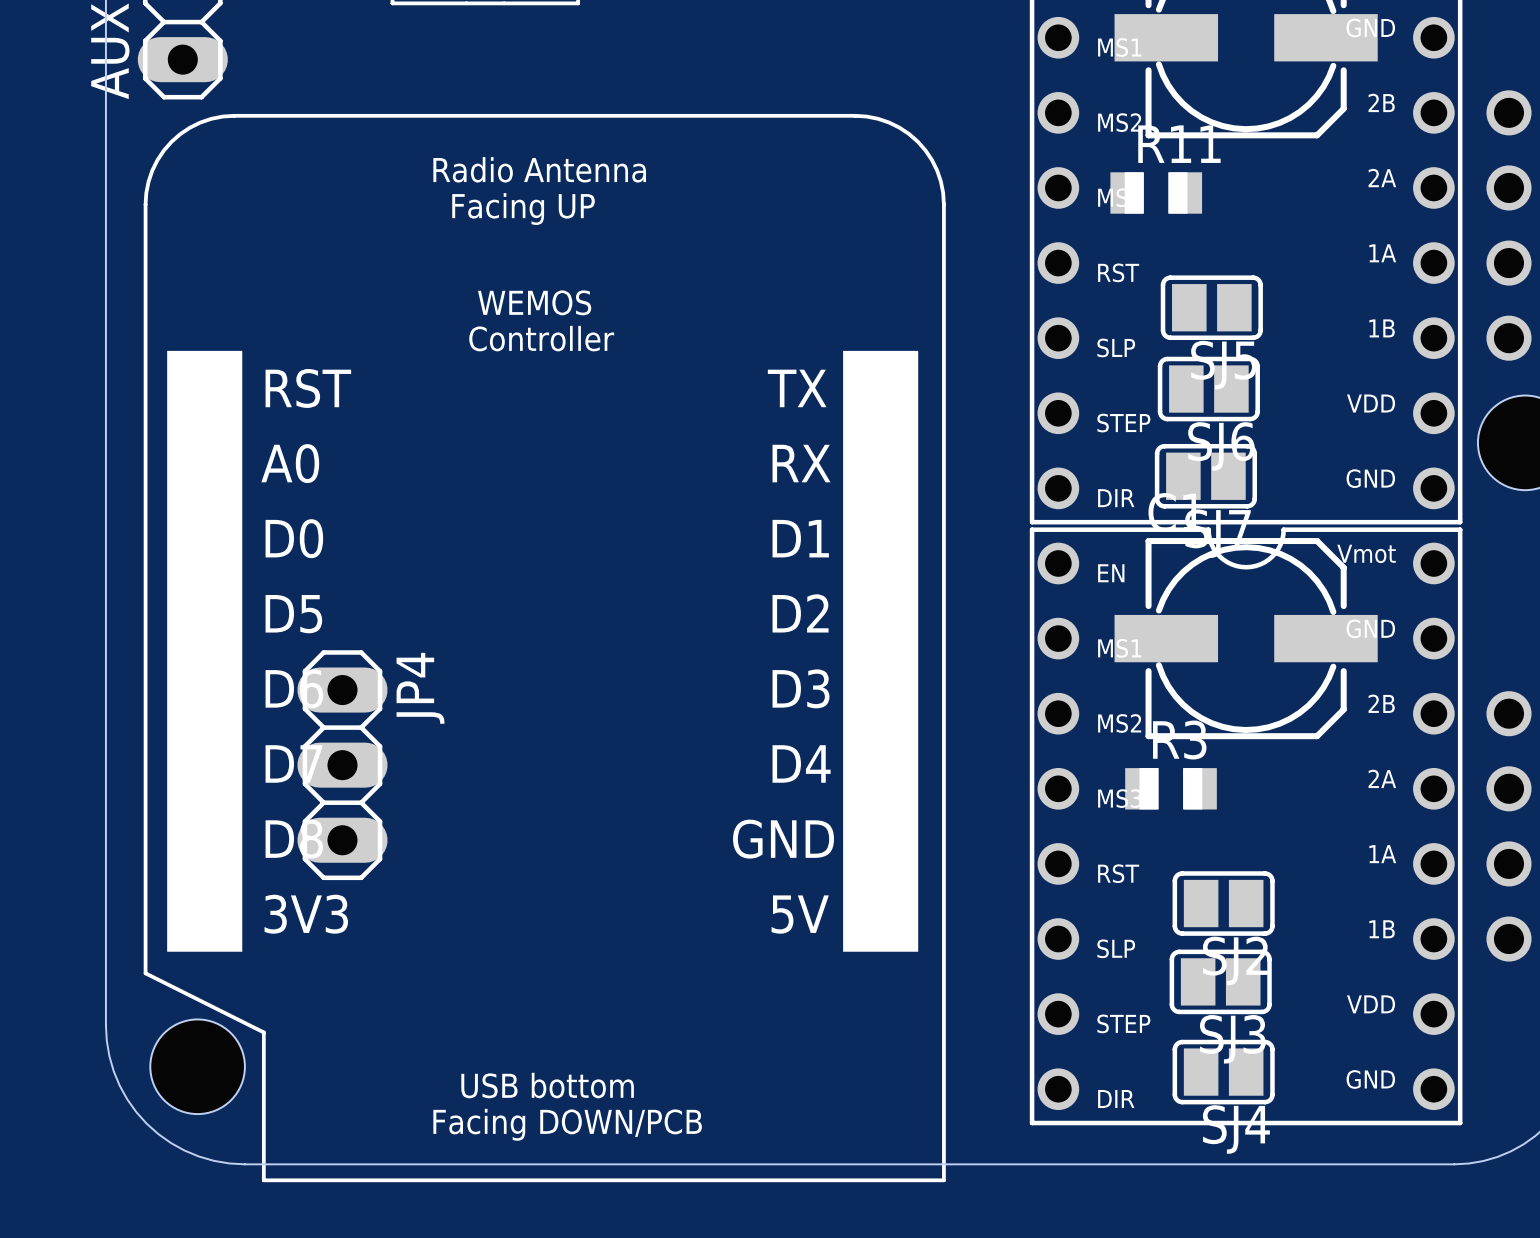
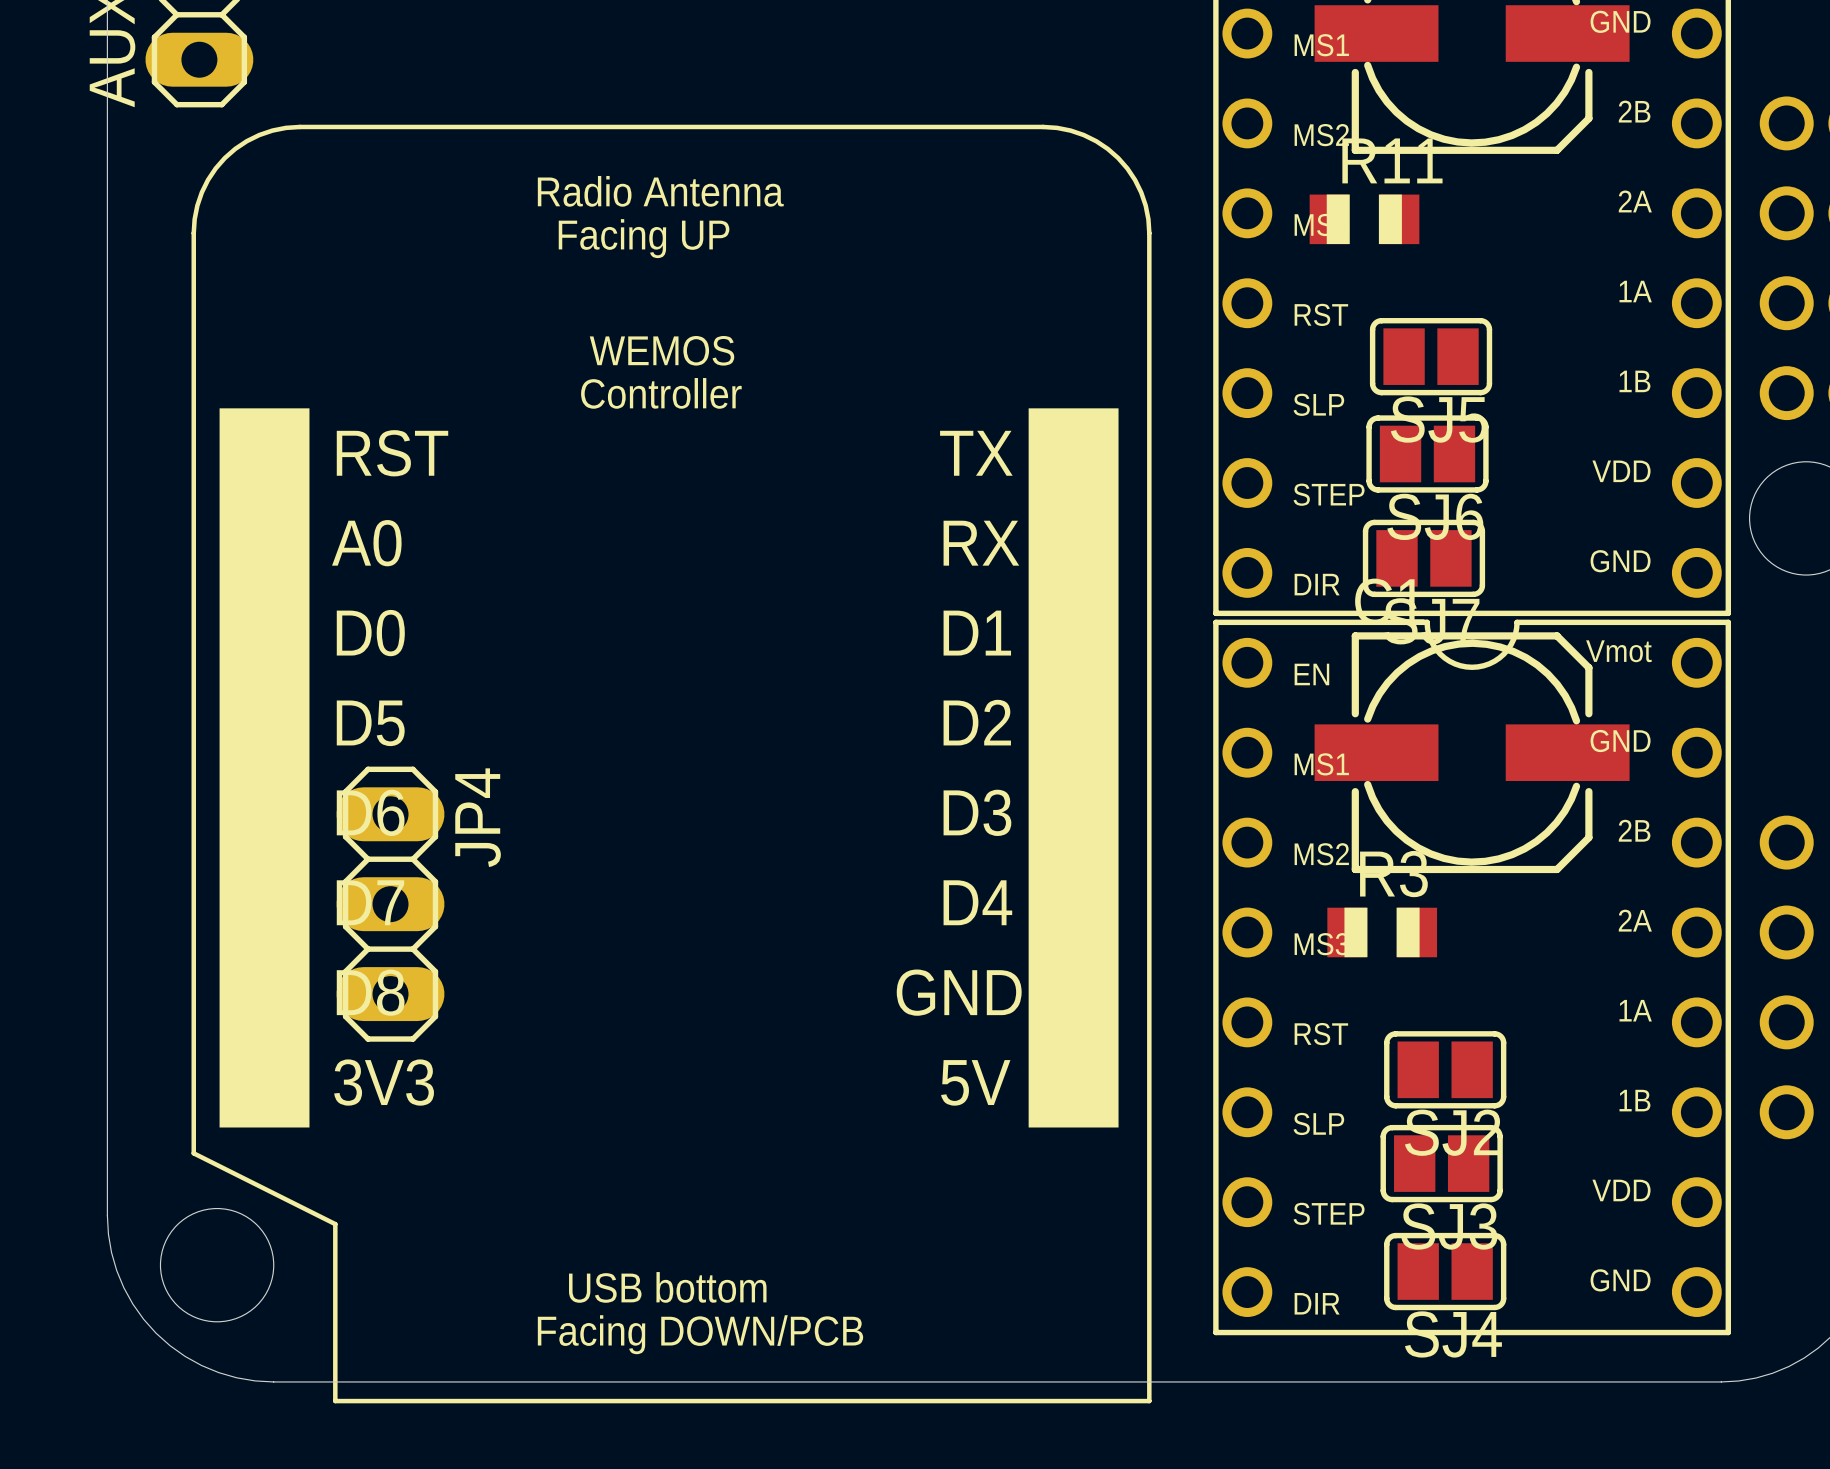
part position: (544, 648) -> (671, 764)

